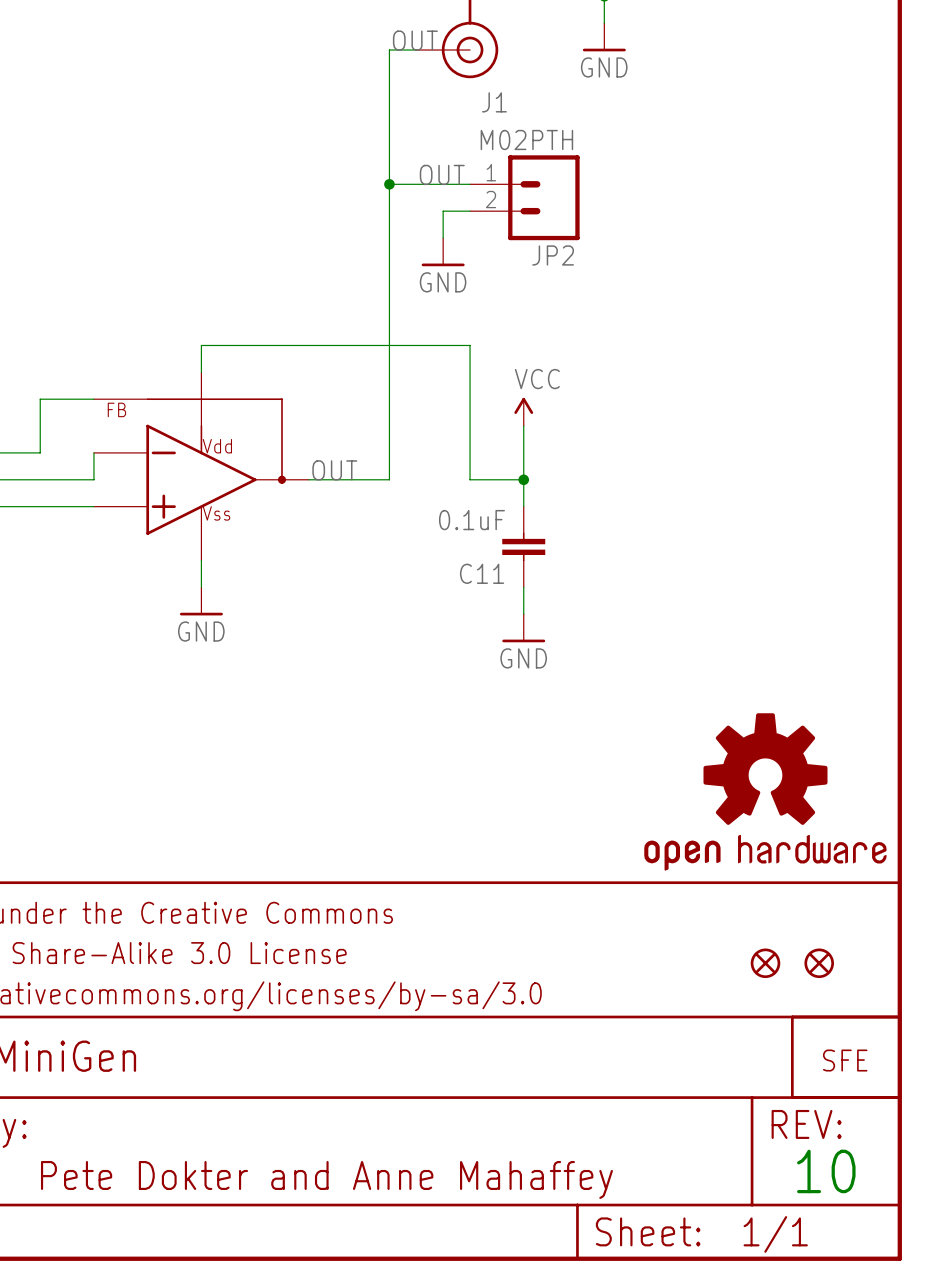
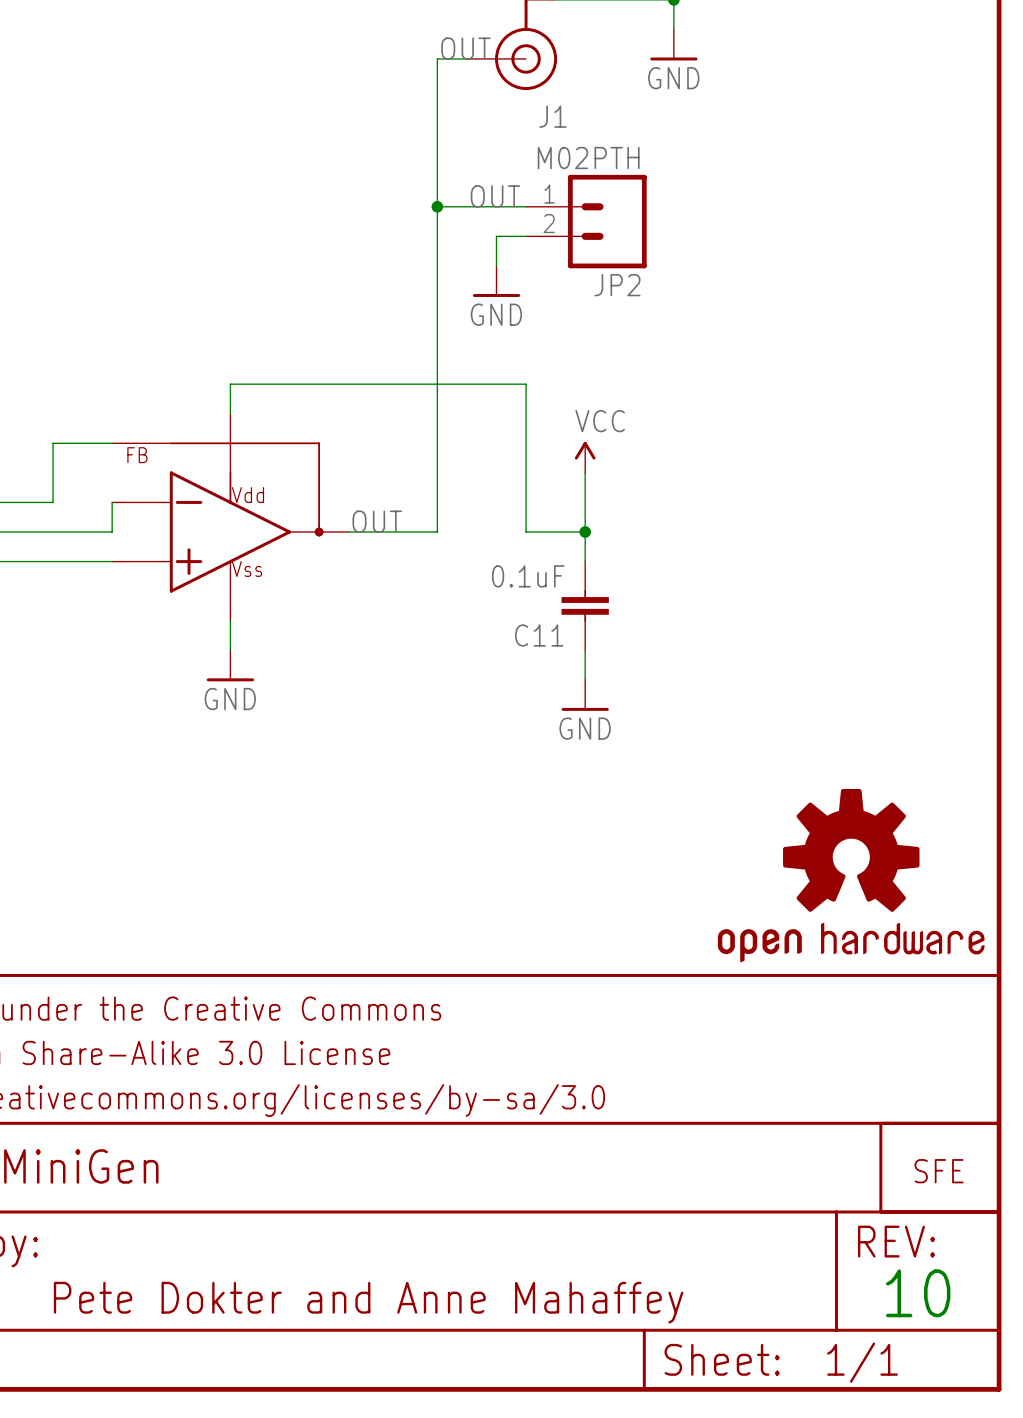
part: (765, 963) -> none
part: (819, 963) -> none

